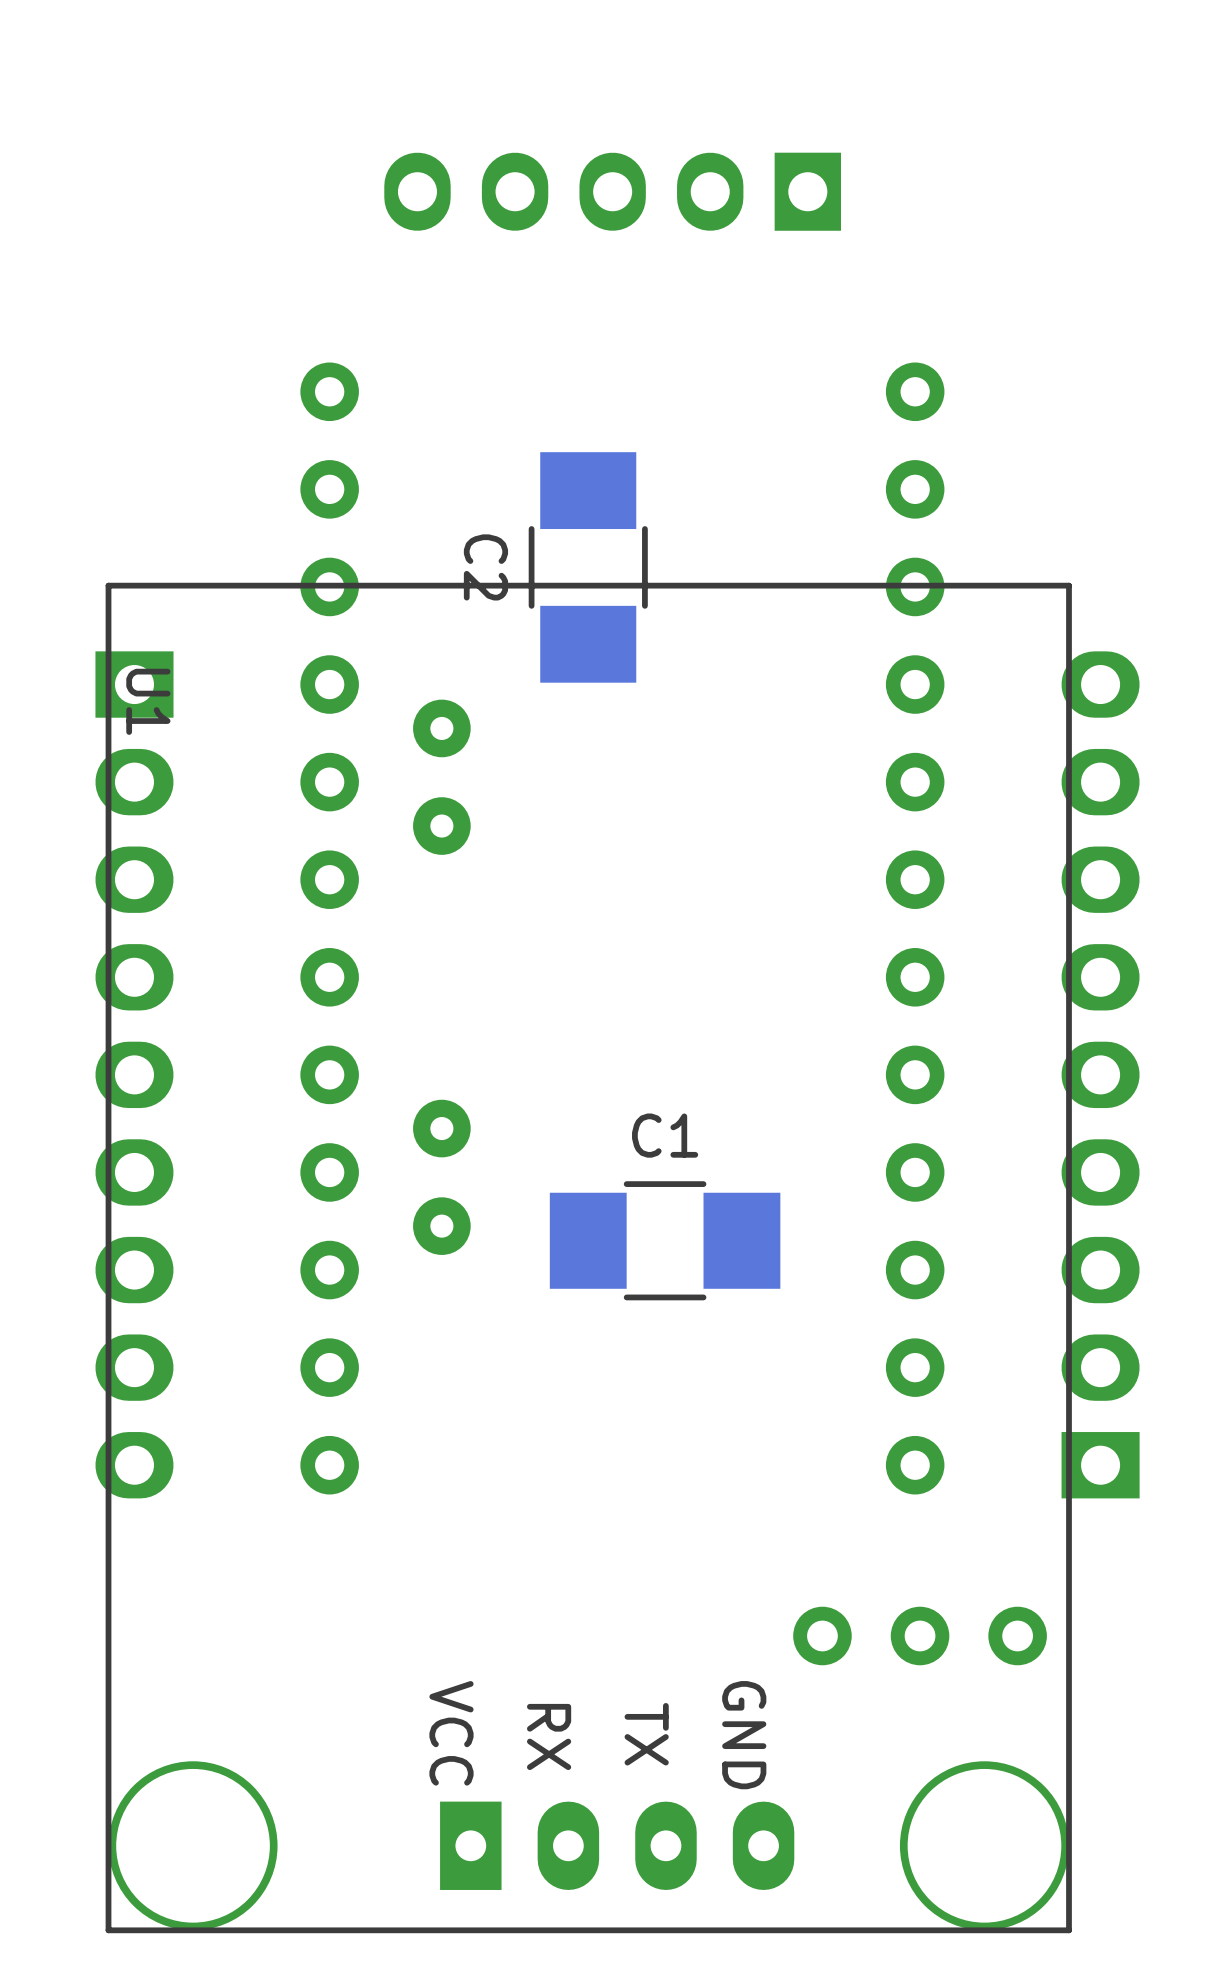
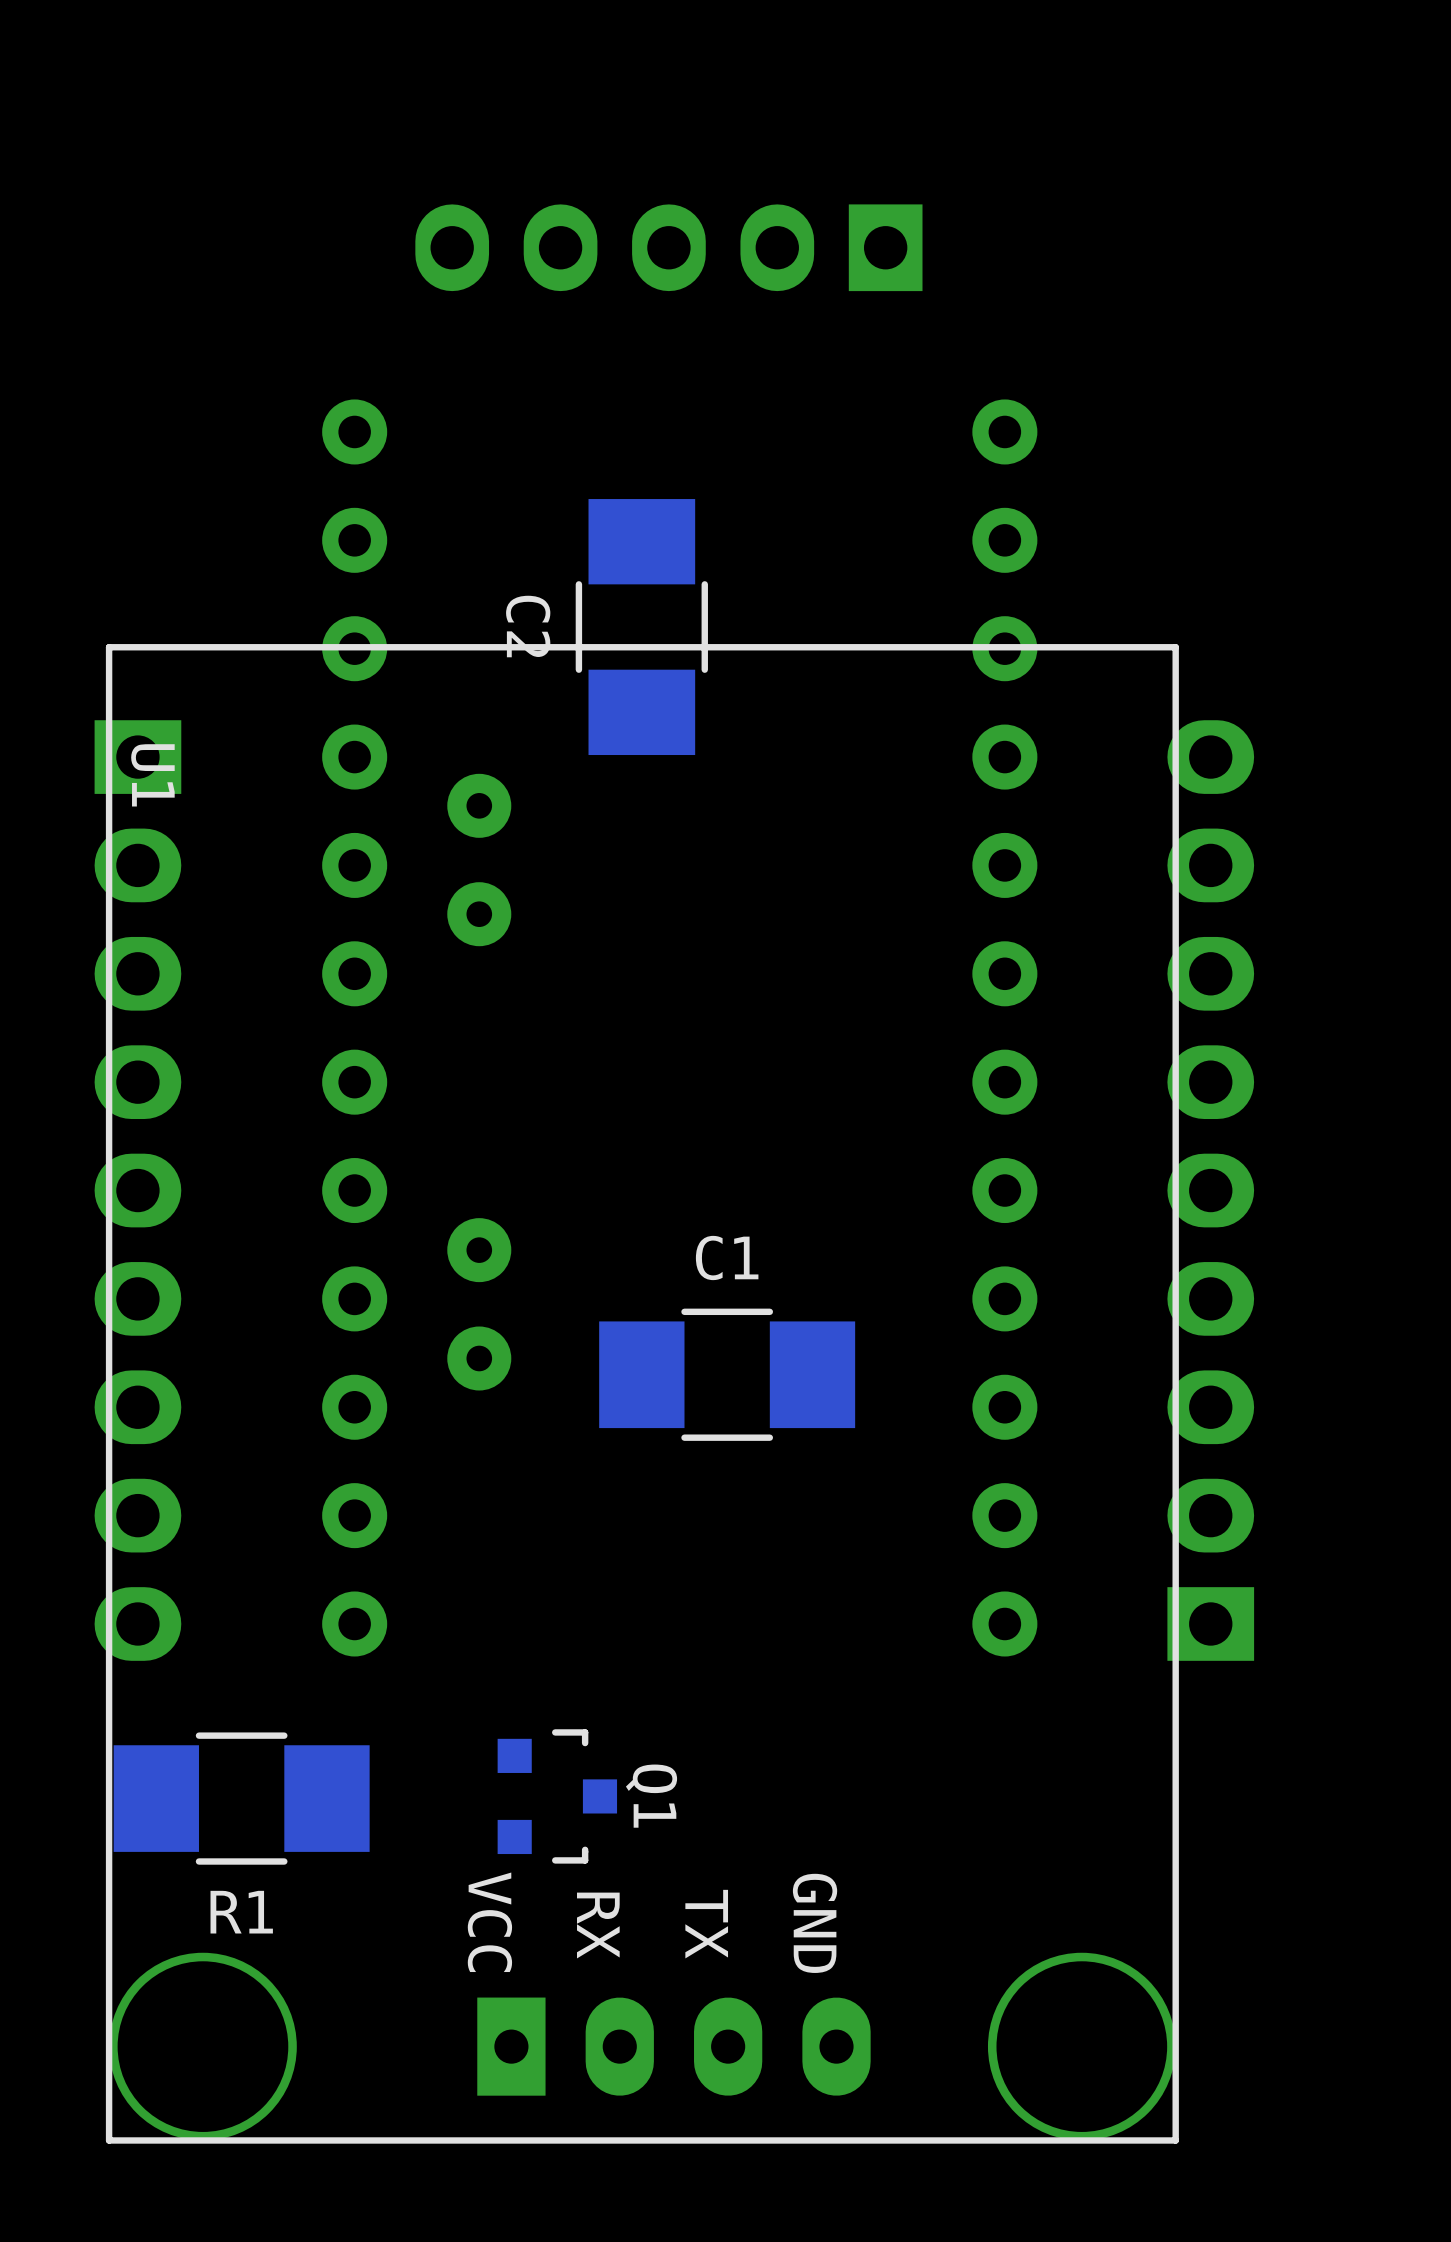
part position: (612, 191) -> (668, 247)
Q1: none -> (557, 1796)
R1: none -> (241, 1798)
part: (920, 1635) -> none

